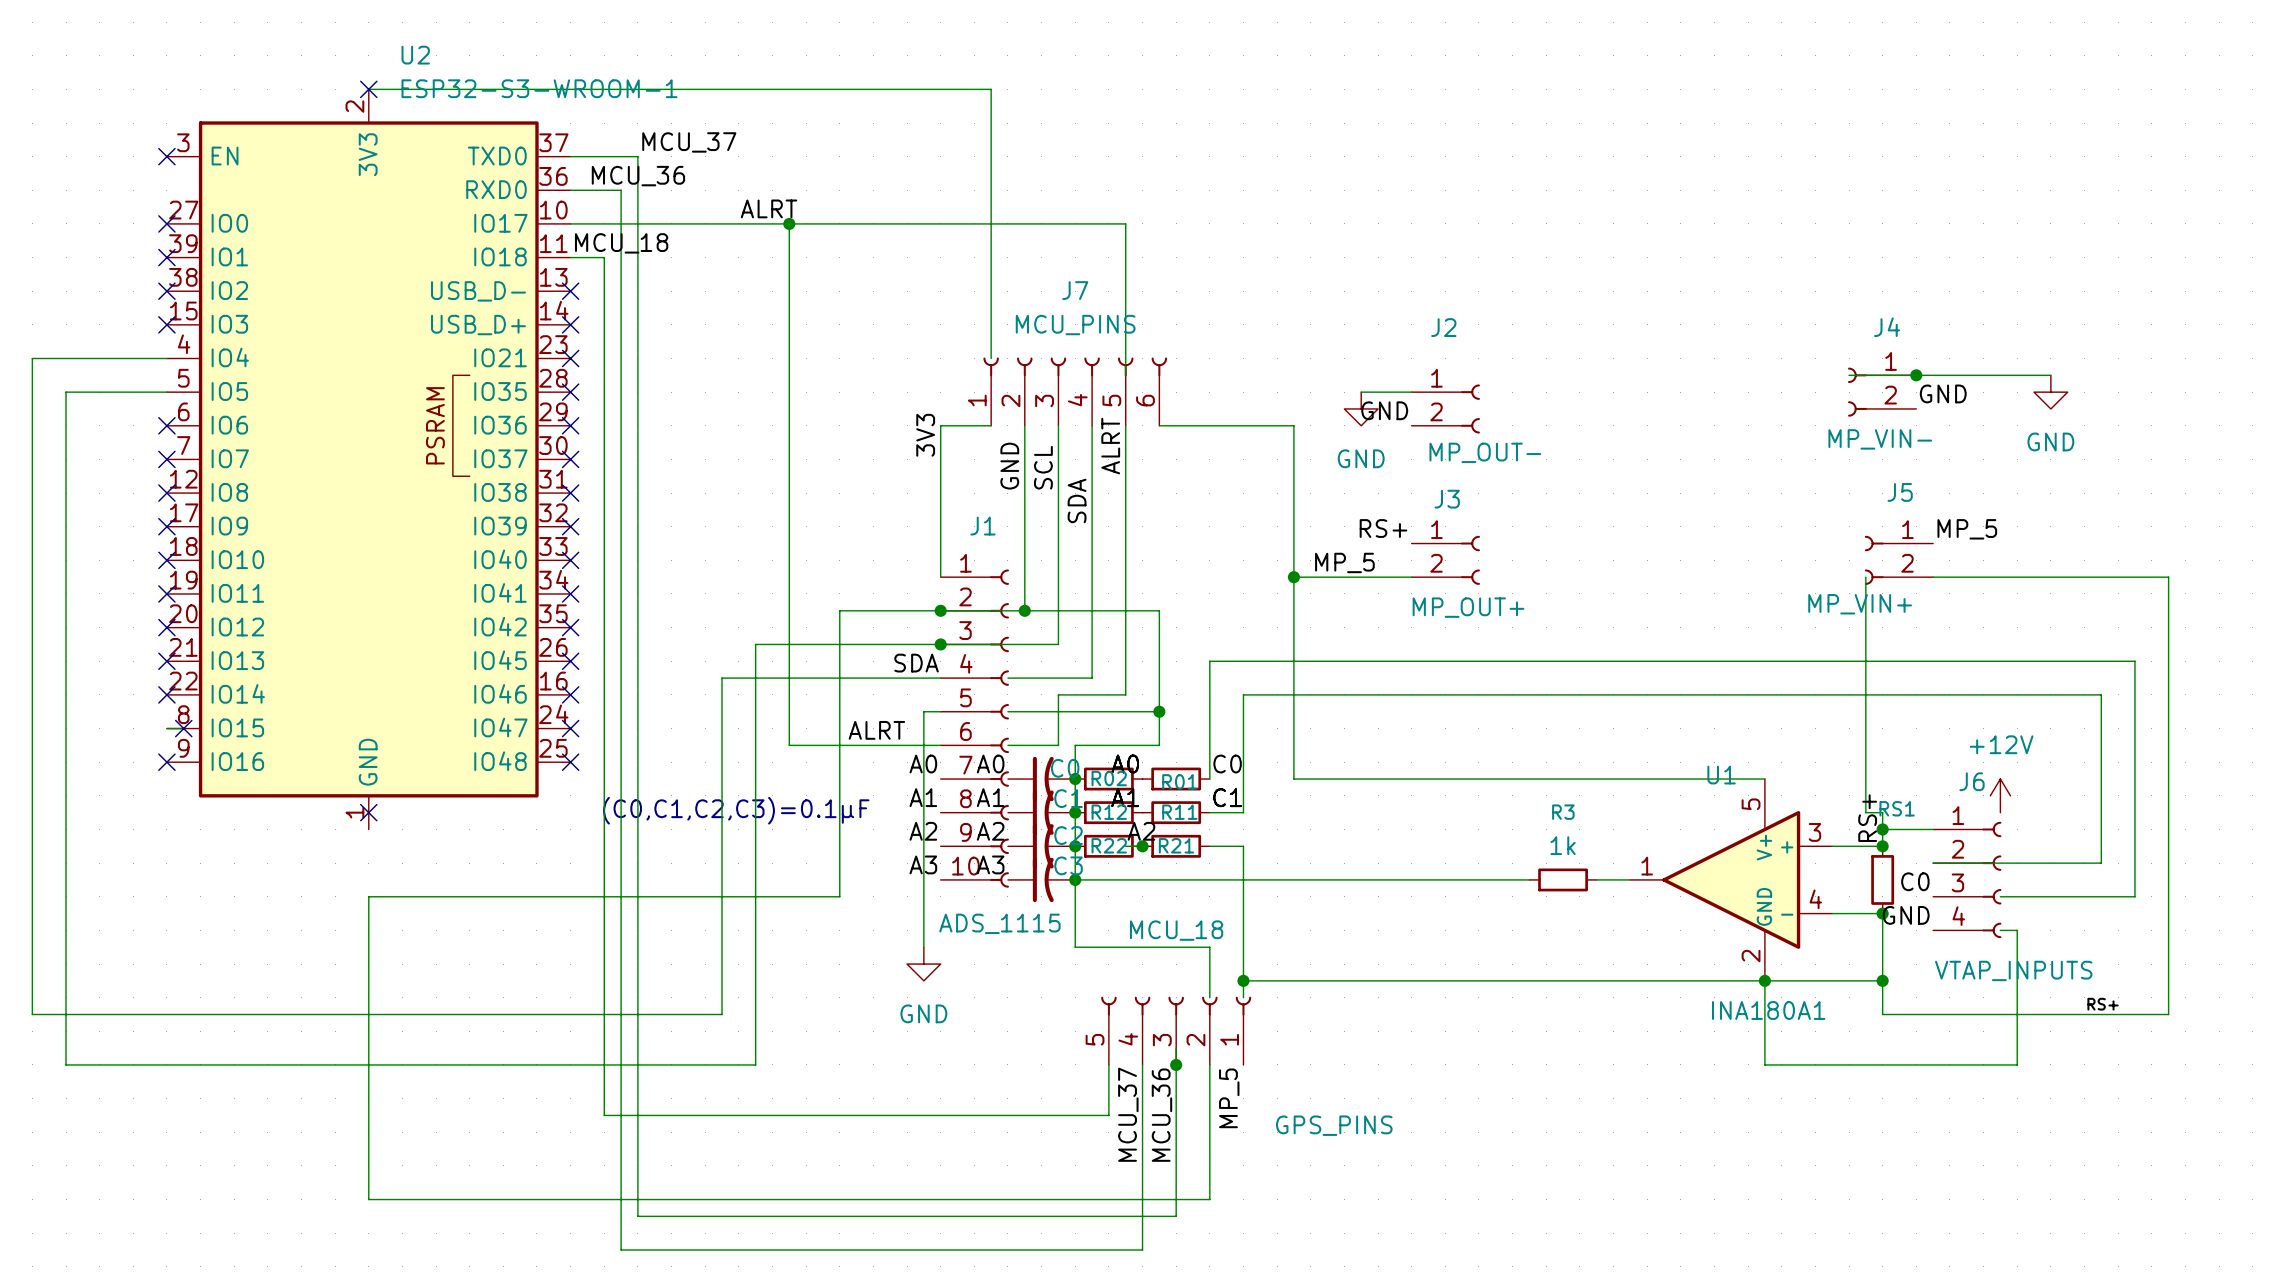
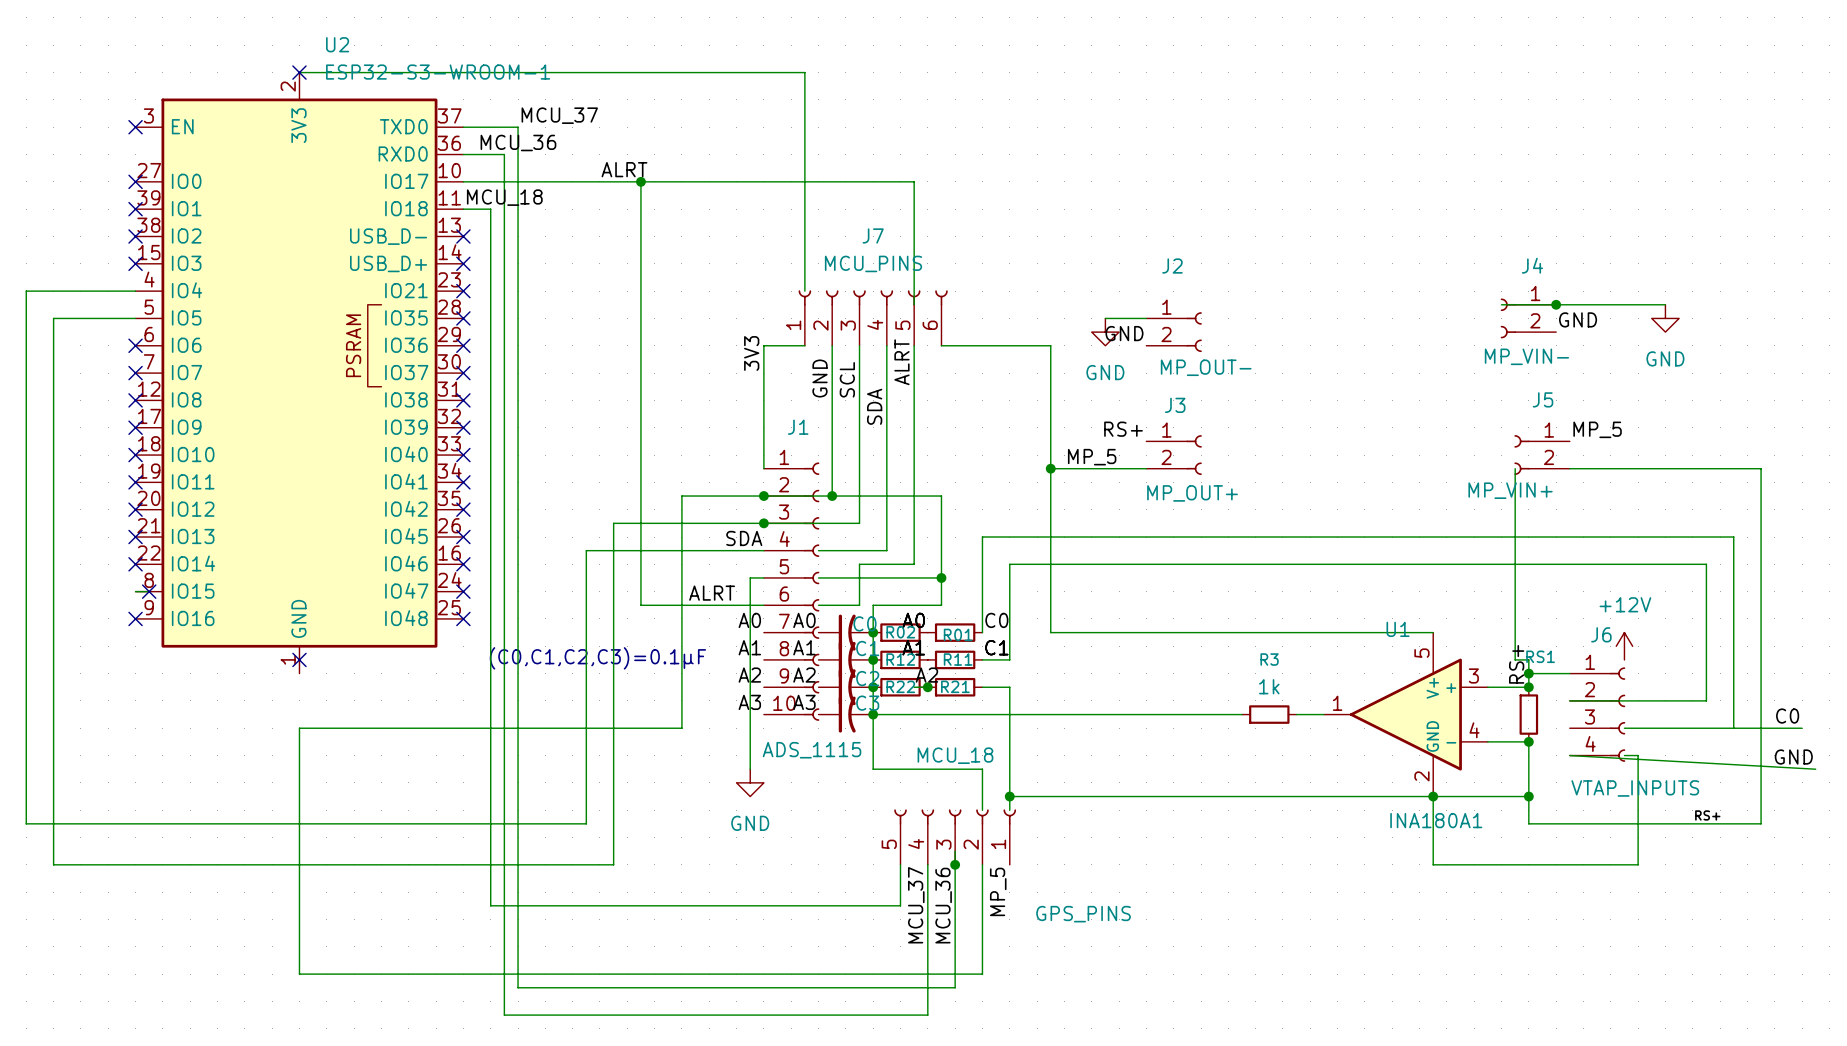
label position: C0 (1915, 881) -> C0 (1787, 716)
wire: none -> (1733, 728) (1802, 728)
label position: GND (1906, 915) -> GND (1793, 757)
wire: none -> (1569, 755) (1815, 769)

